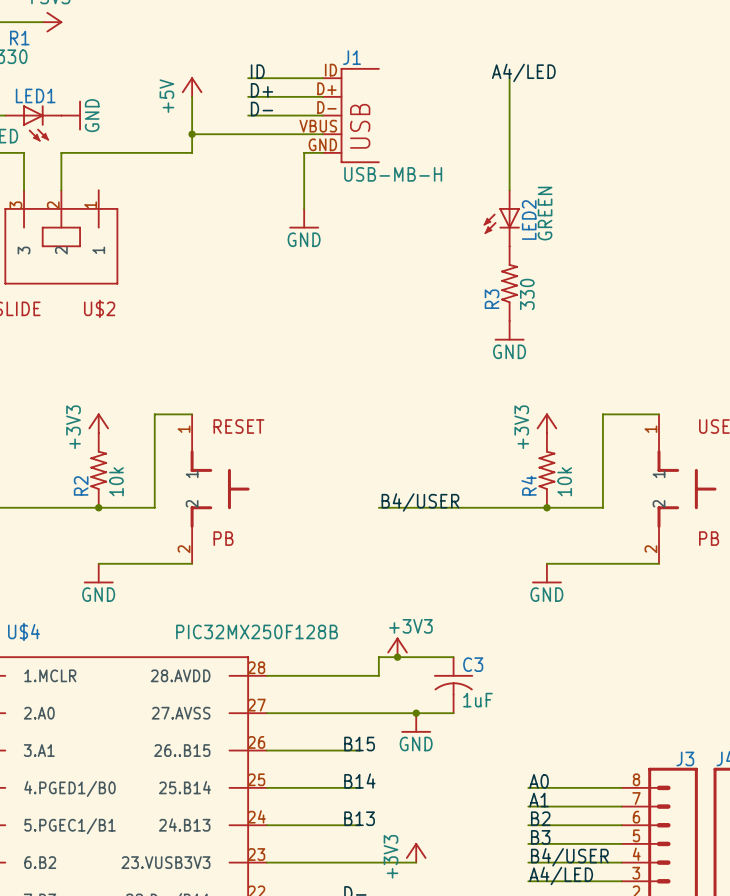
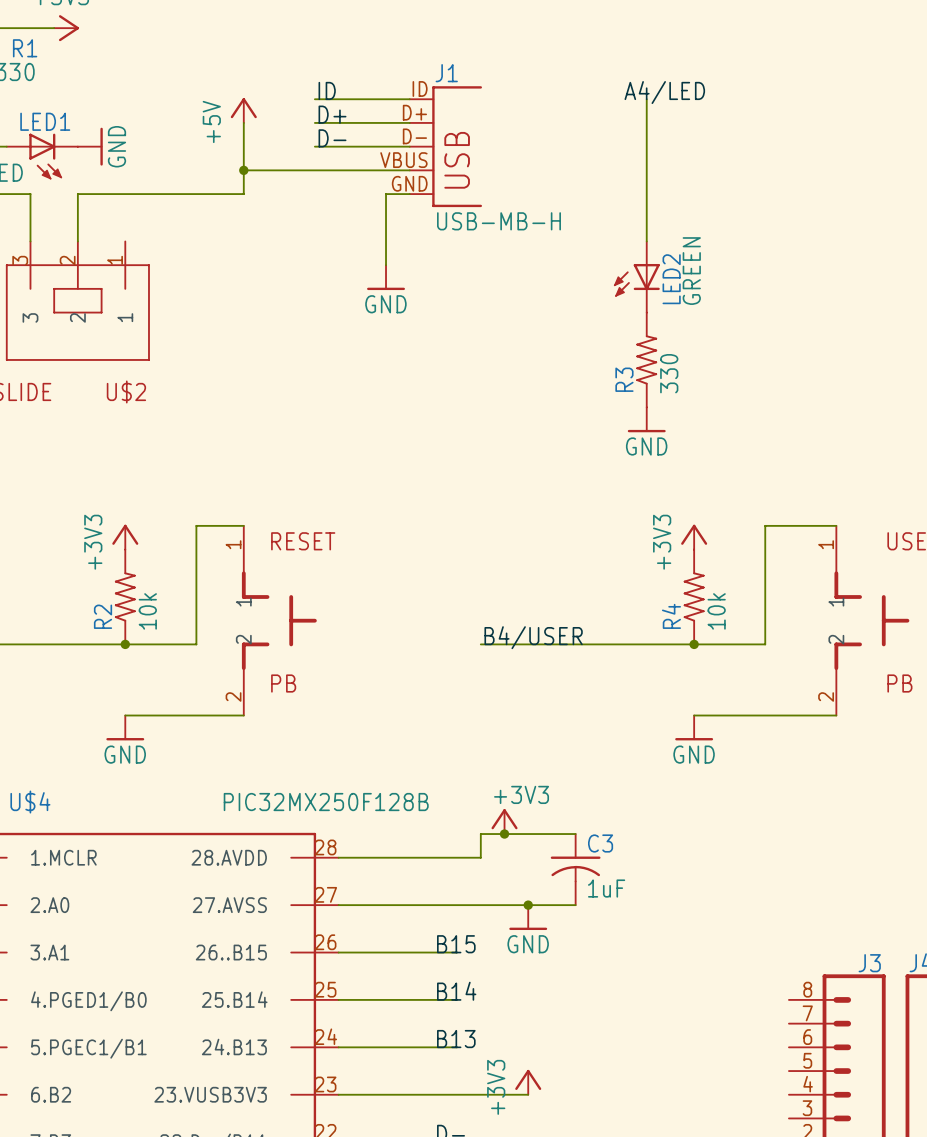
label: A0 (539, 781) -> none
wire: (528, 787) (621, 787) -> none
label: A1 (539, 800) -> none
wire: (528, 806) (621, 806) -> none
label: B2 (540, 818) -> none
wire: (528, 825) (621, 825) -> none
label: B3 (540, 837) -> none
wire: (528, 843) (621, 843) -> none
label: B4/USER (569, 857) -> none
wire: (528, 862) (621, 862) -> none
label: A4/LED (561, 875) -> none
wire: (528, 881) (621, 881) -> none

